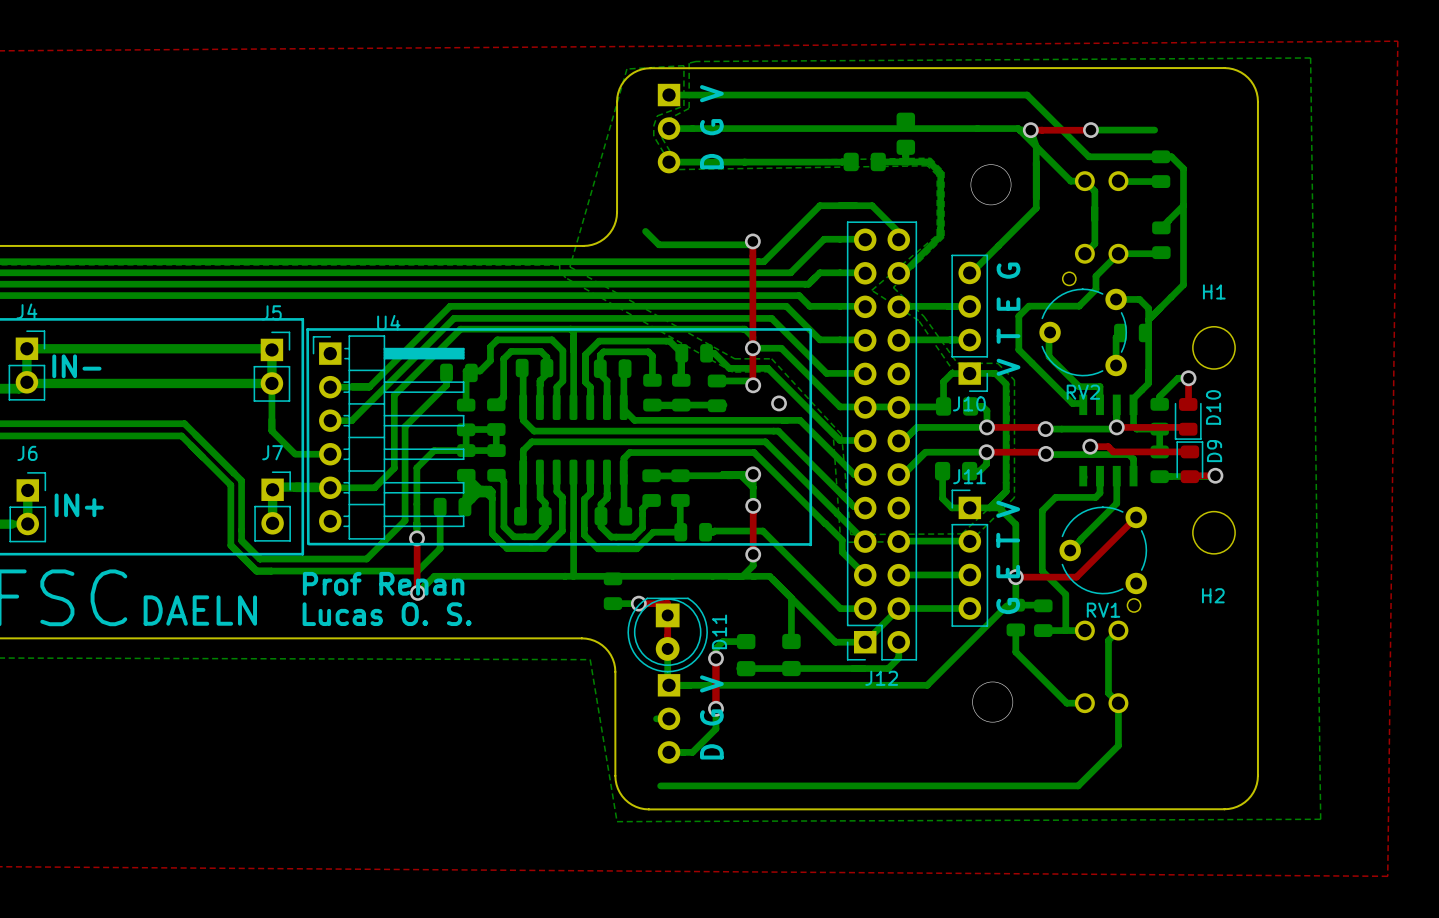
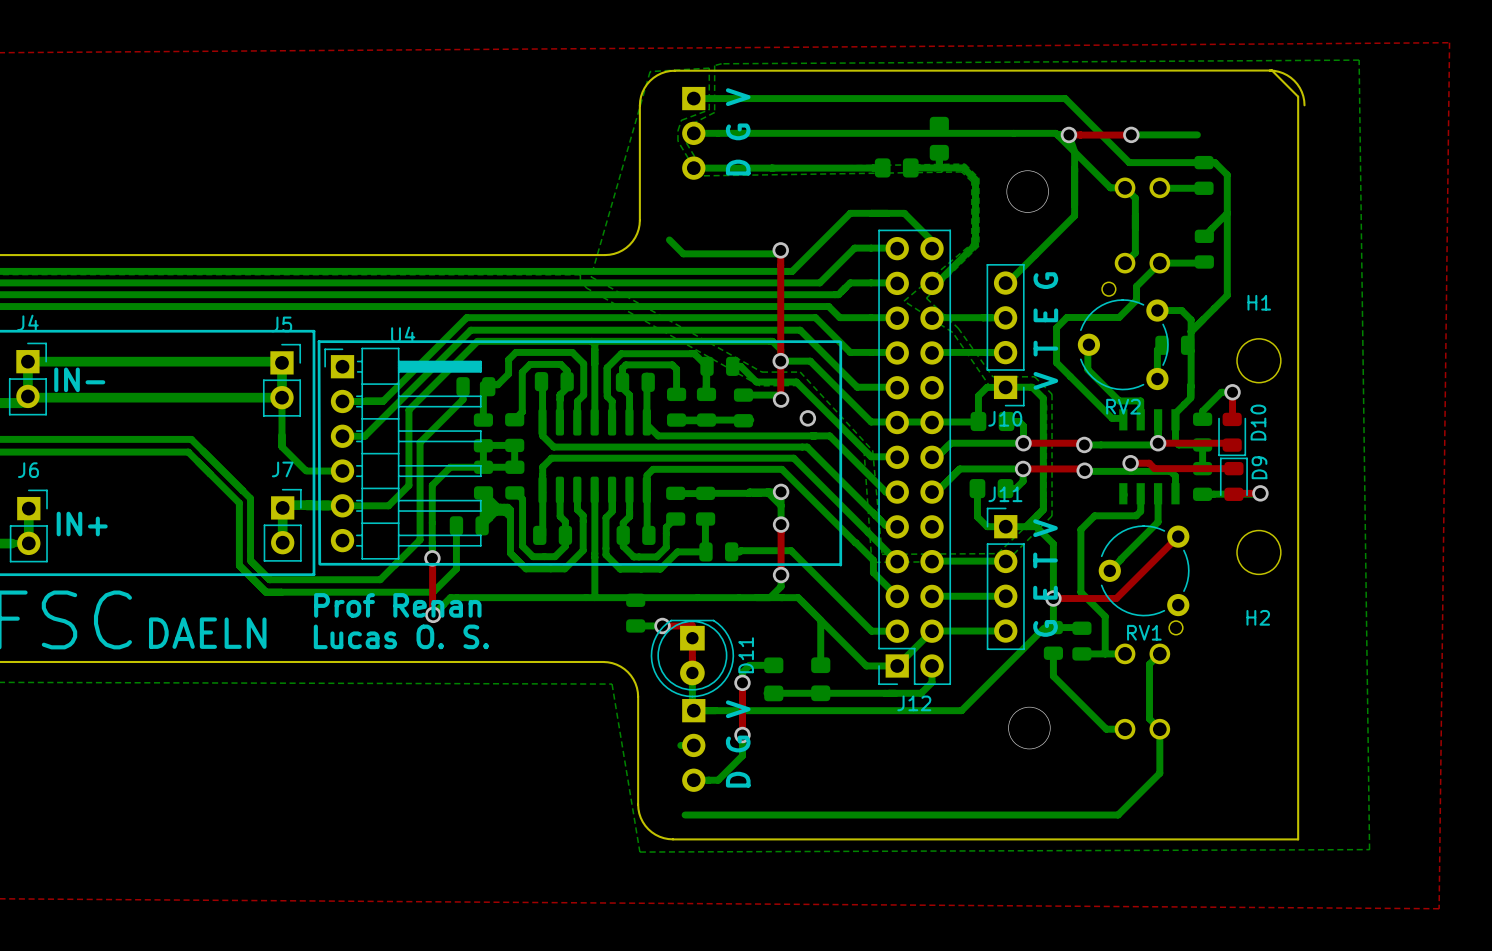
board edge: (1257, 101) (1257, 776) -> none
board edge: (1257, 775) (1255, 788) (1248, 799) (1237, 806) (1224, 809) -> none
board edge: (1224, 809) (648, 809) -> (1271, 70) (1298, 96) (1298, 839) (673, 839)

